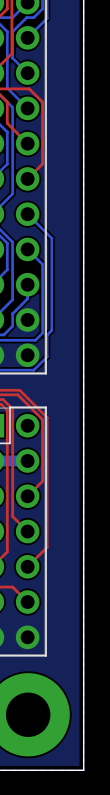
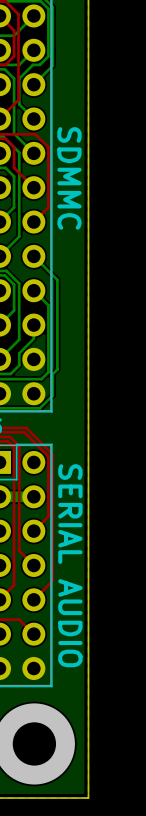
text: none -> SDMMC (69, 178)
text: none -> SERIAL AUDIO (70, 565)

